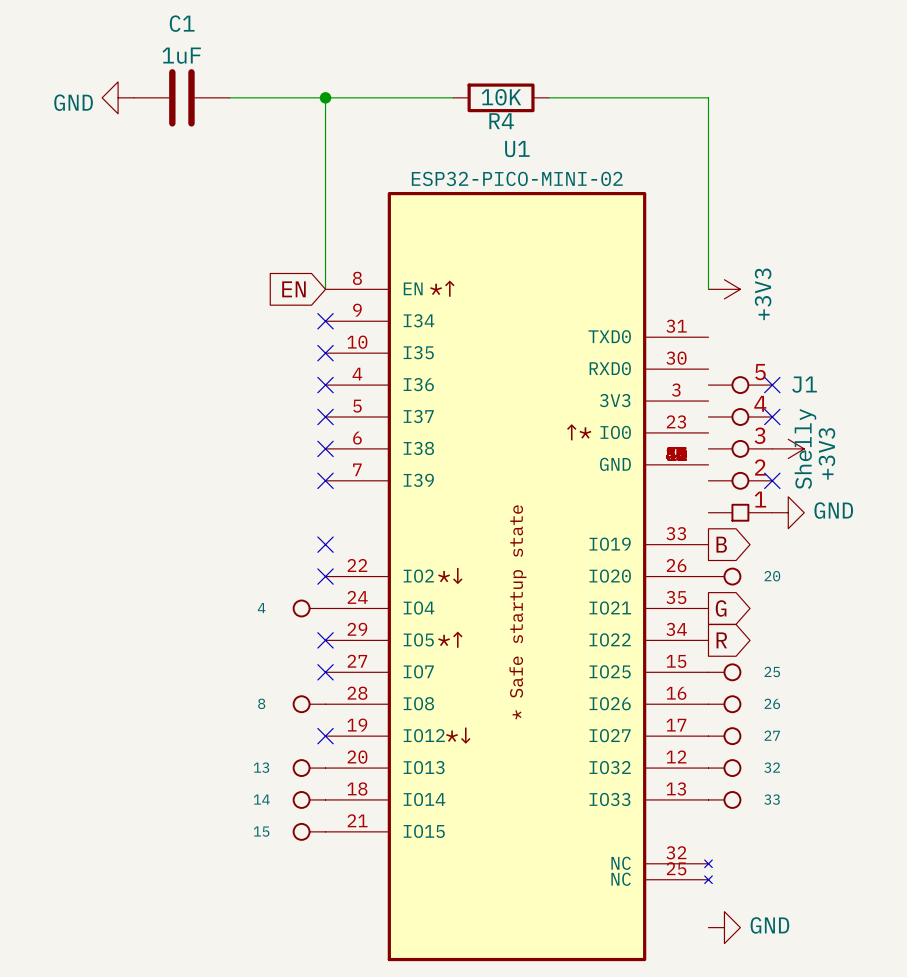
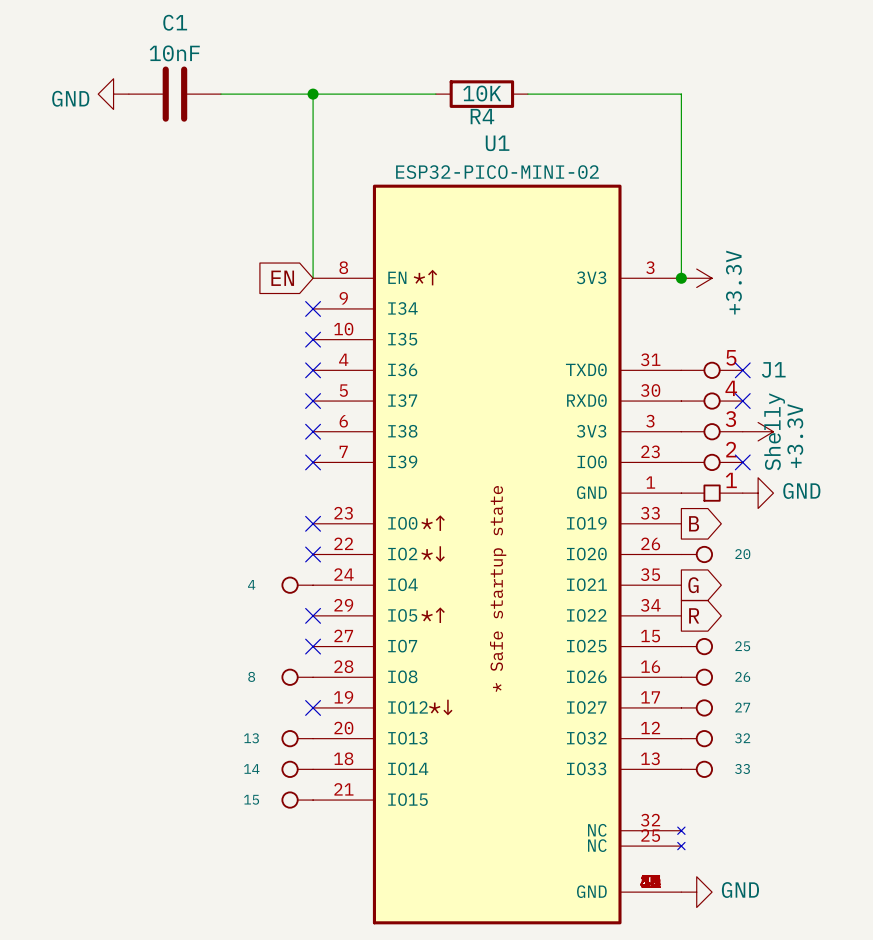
C1 value: 1uF (181, 55) -> 10nF (174, 53)
U1 symbol: [325, 192, 713, 962] -> [313, 184, 686, 925]
junction: none -> (681, 278)
power symbol: +3V3 (724, 289) -> +3.3V (696, 278)
power symbol: +3V3 (788, 448) -> +3.3V (758, 431)

